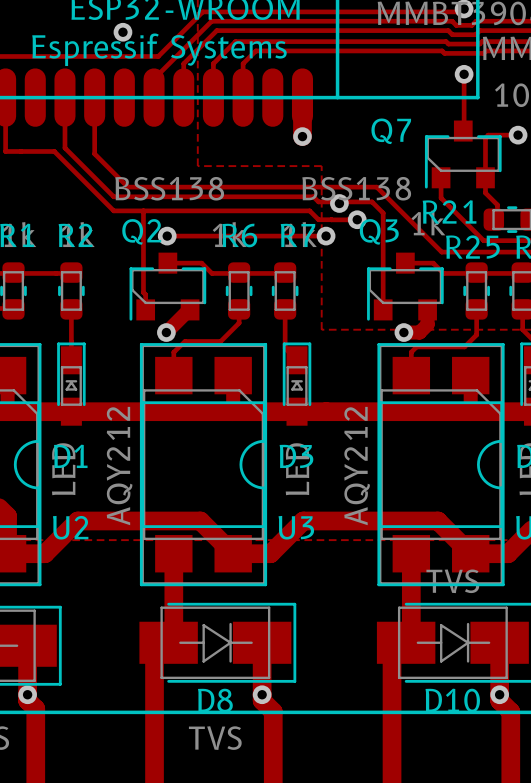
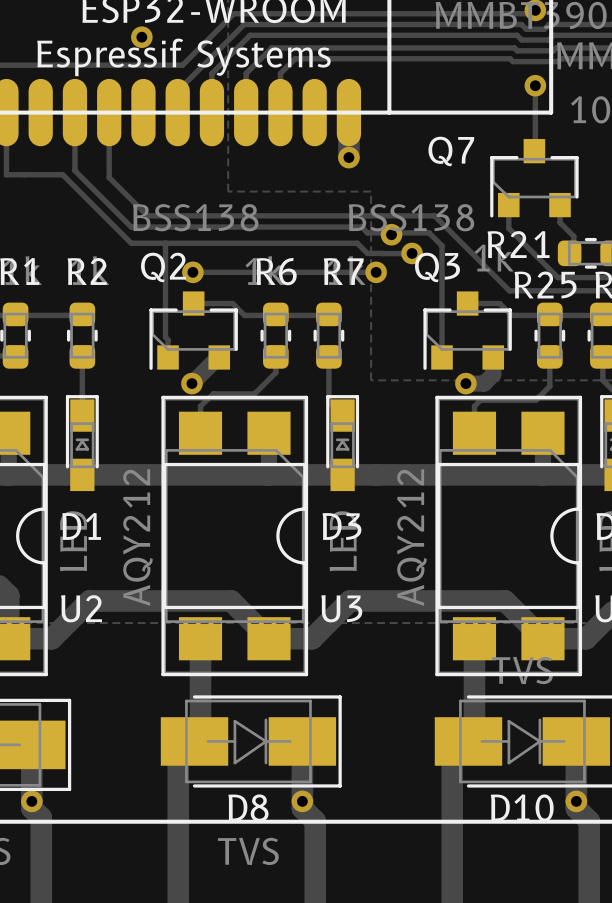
track: (518, 135) (488, 135) (485, 137) (485, 177) -> none
via: (518, 135) -> none

